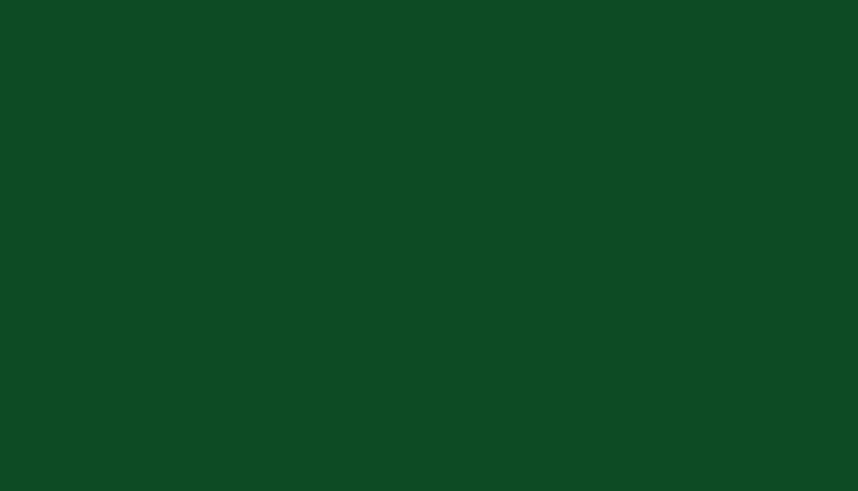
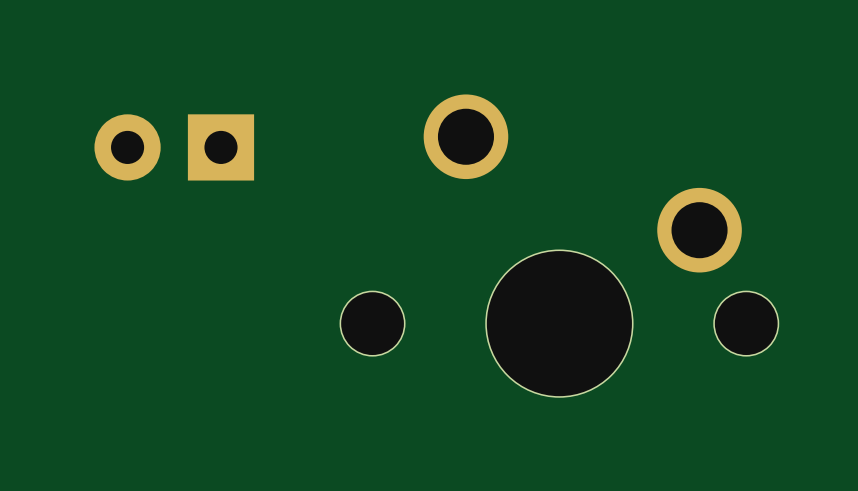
part: none -> (174, 147)
part: none -> (559, 245)

